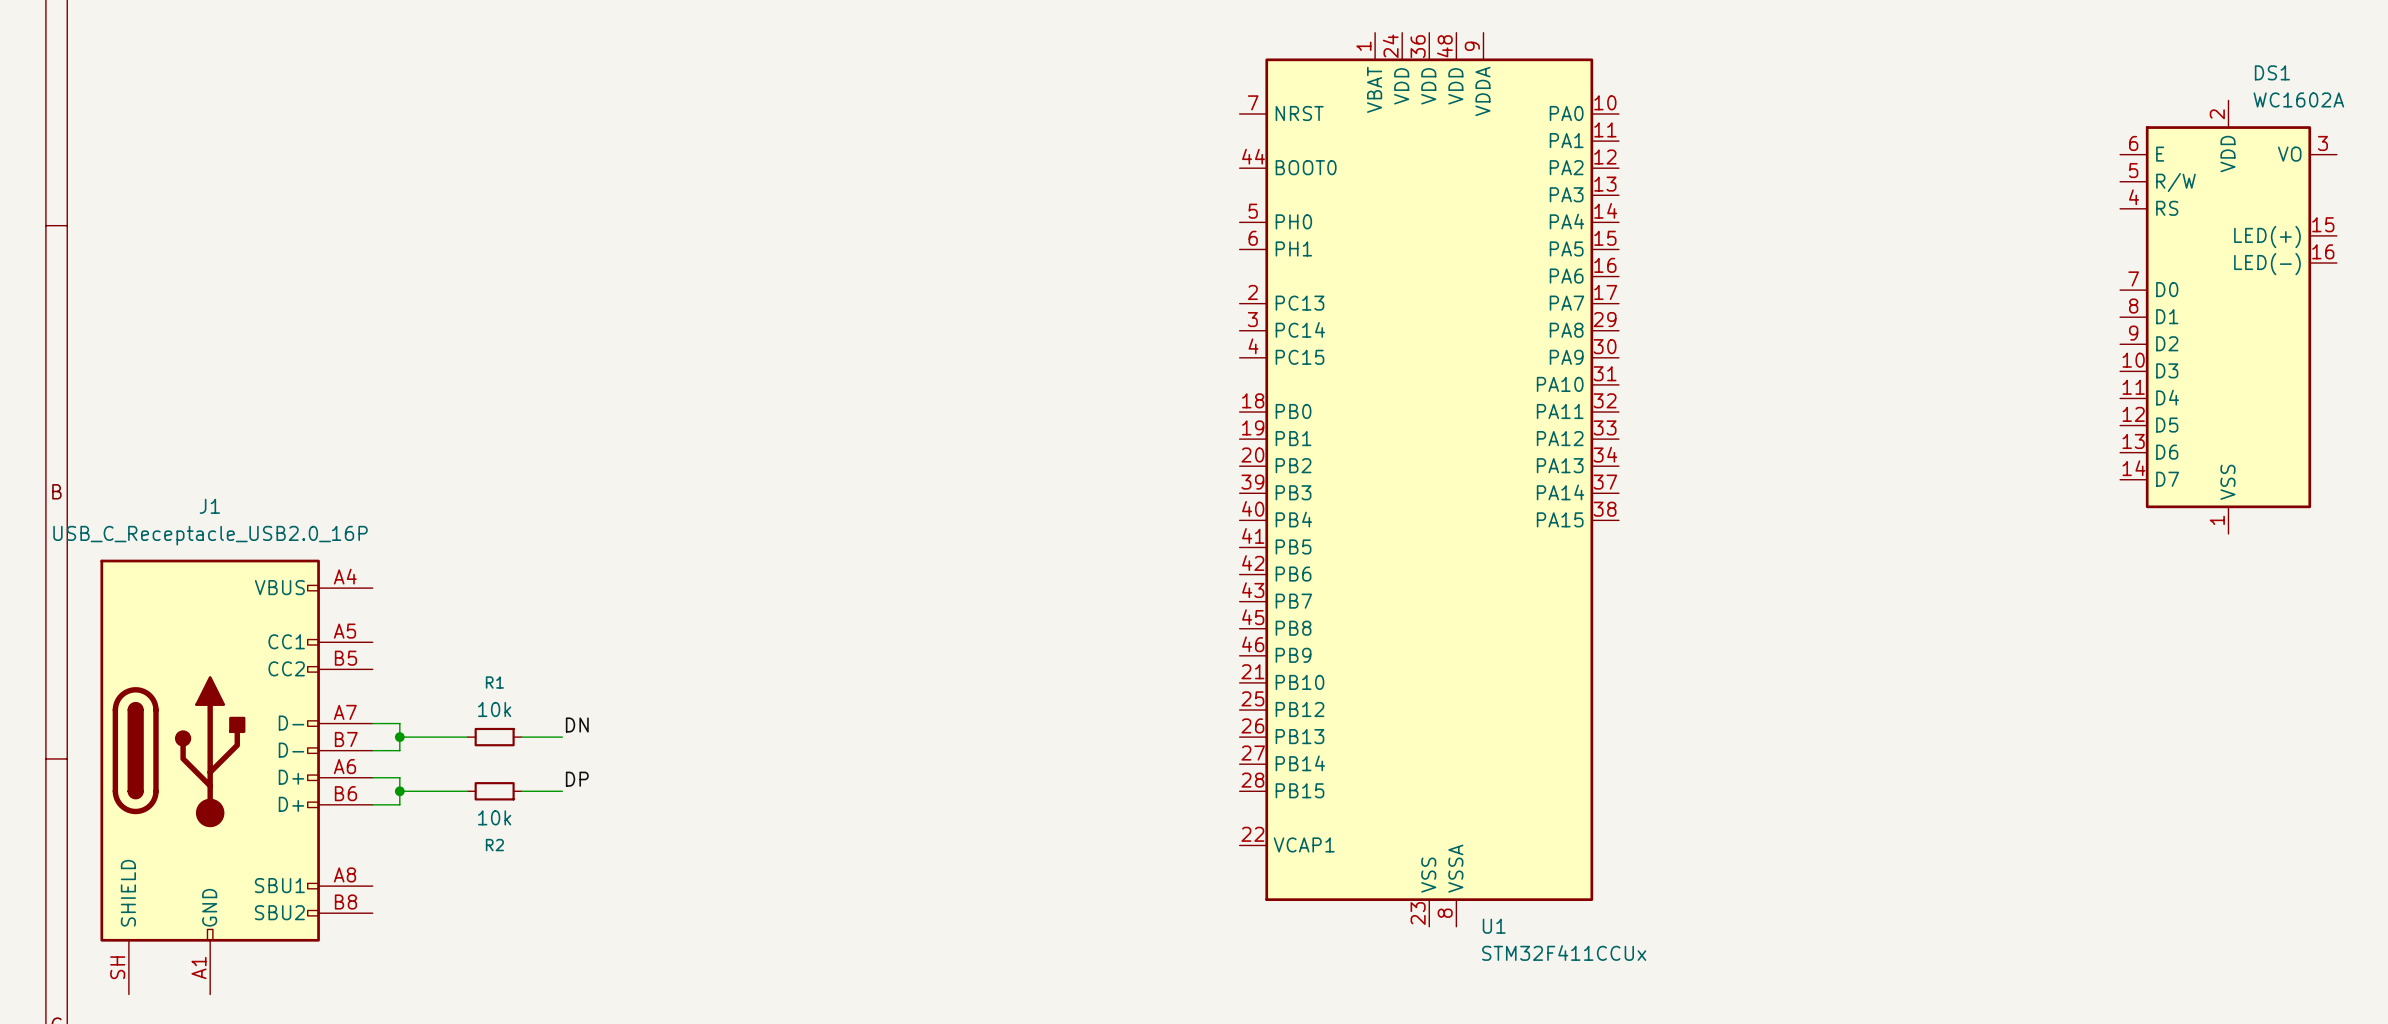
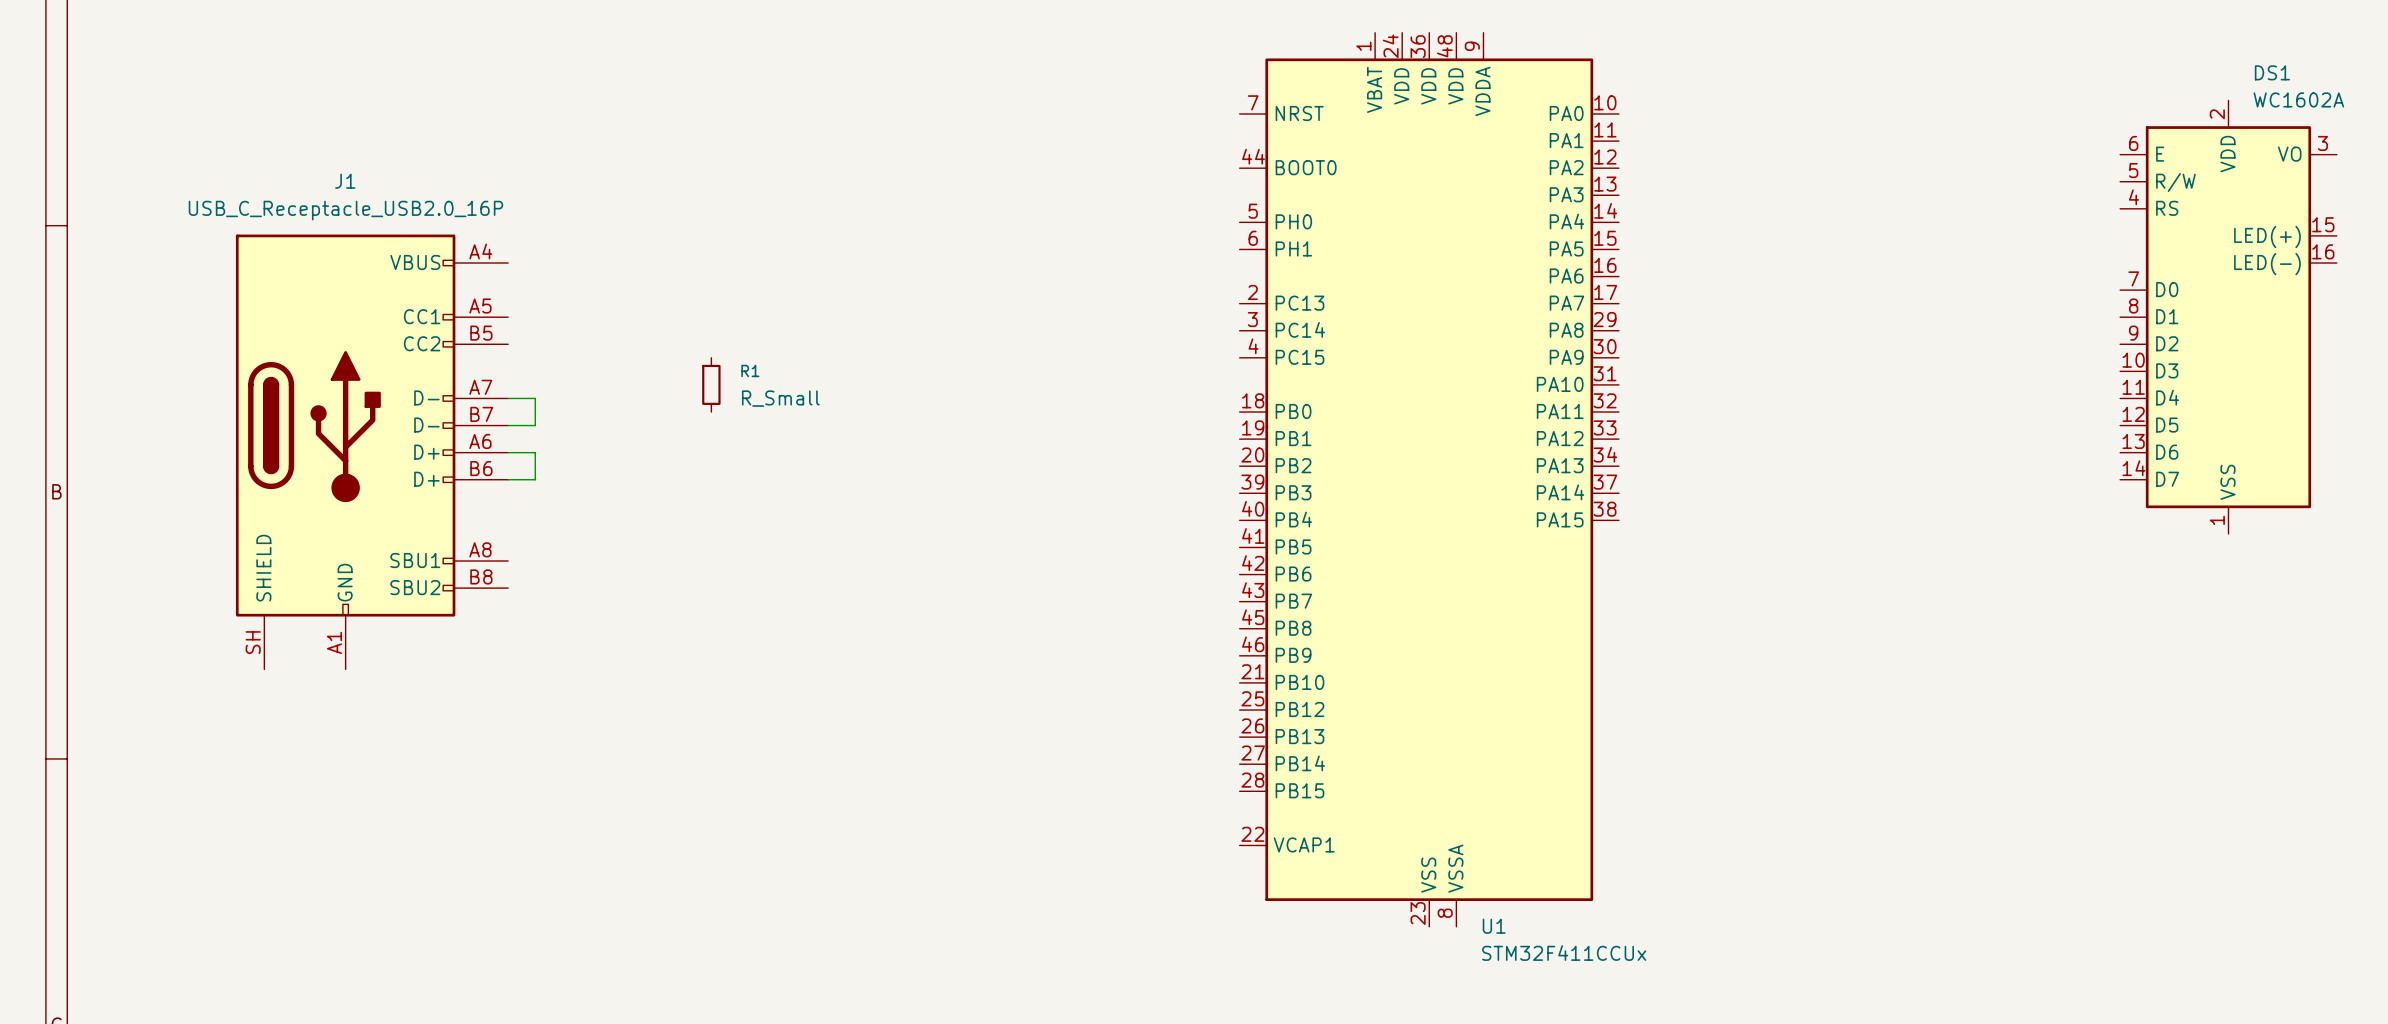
wire: none -> (508, 398) (535, 398) (535, 425) (508, 425)
wire: none -> (508, 452) (535, 452) (535, 479) (508, 479)
R1 value: 10k (494, 709) -> R_Small (780, 398)
wire: (372, 723) (399, 723) (399, 750) (372, 750) -> none
label: DN (577, 725) -> none
wire: (399, 737) (467, 737) -> none
junction: (399, 737) -> none
R1 rotation: 0° (494, 737) -> 90° clockwise (711, 384)
R1 position: (494, 737) -> (711, 384)
wire: (521, 737) (562, 737) -> none
J1 position: (236, 777) -> (372, 451)
wire: (372, 777) (399, 777) (399, 804) (372, 804) -> none
label: DP (577, 779) -> none
wire: (399, 791) (467, 791) -> none
junction: (399, 791) -> none
R2: 10k (494, 791) -> none
wire: (521, 791) (562, 791) -> none

